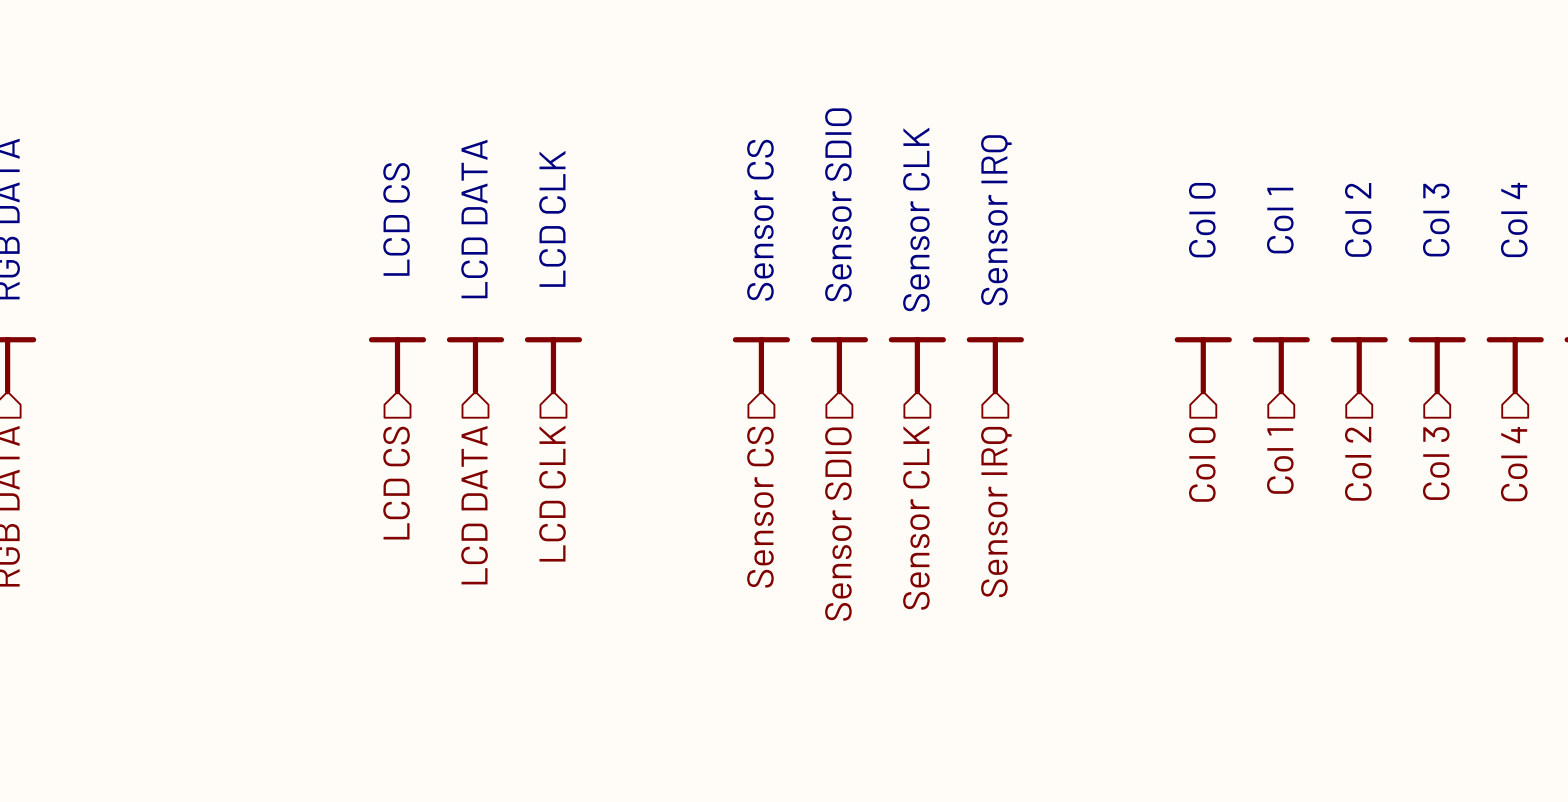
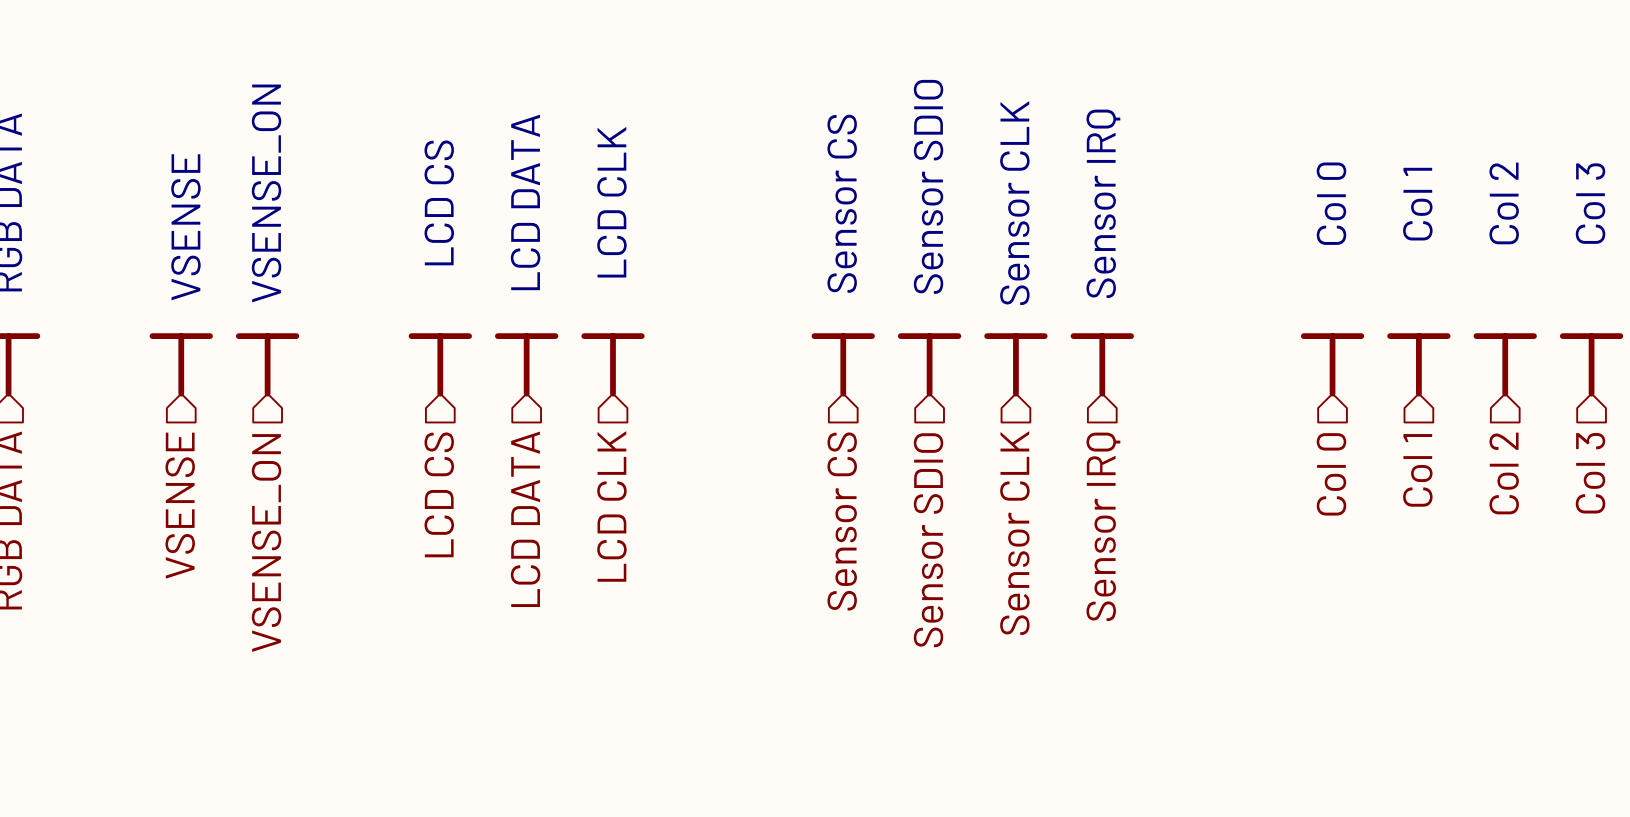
power symbol: none -> VSENSE (181, 364)
power symbol: none -> VSENSE_ON (267, 364)
hierarchical label: none -> VSENSE (180, 505)
hierarchical label: none -> VSENSE_ON (266, 542)

